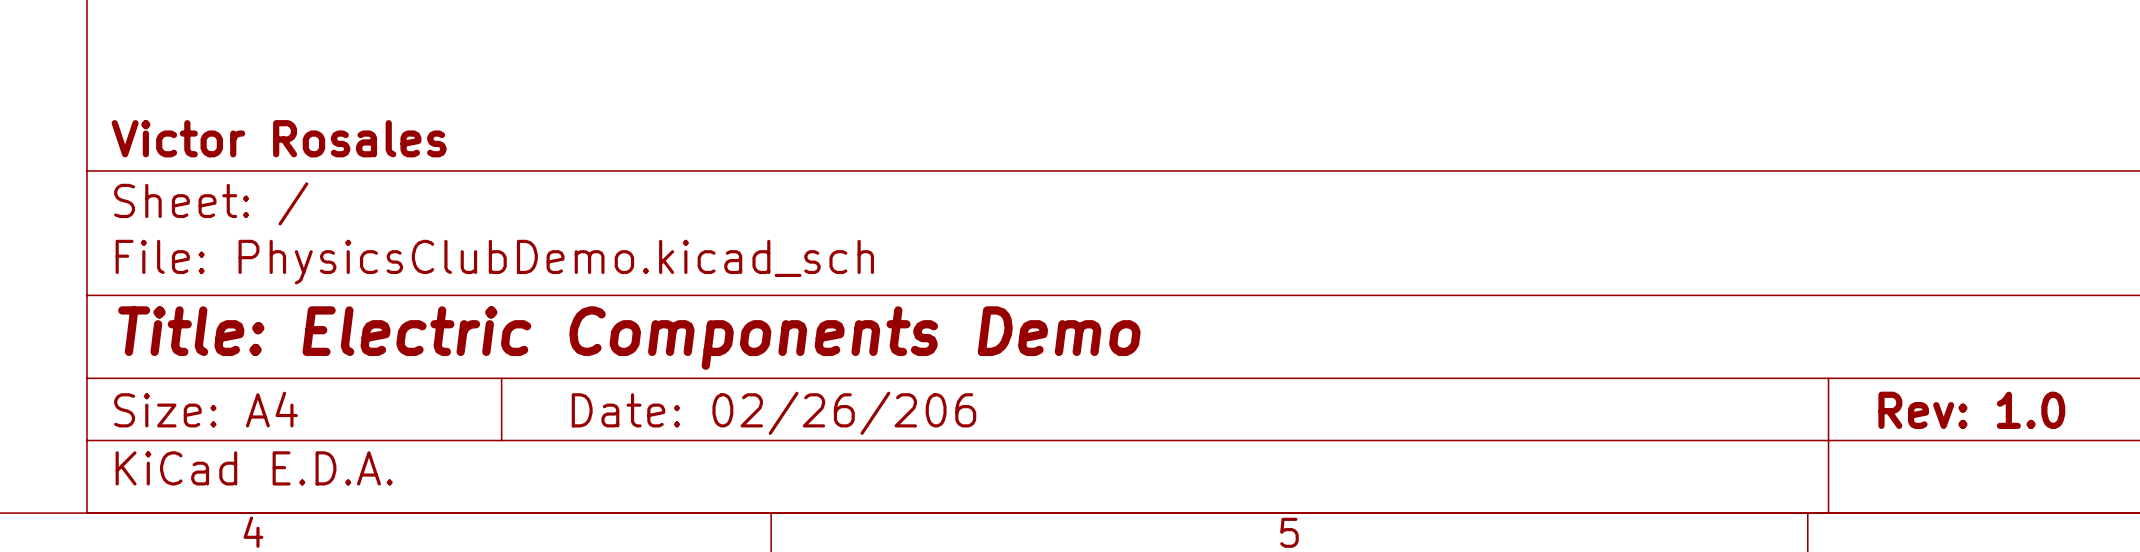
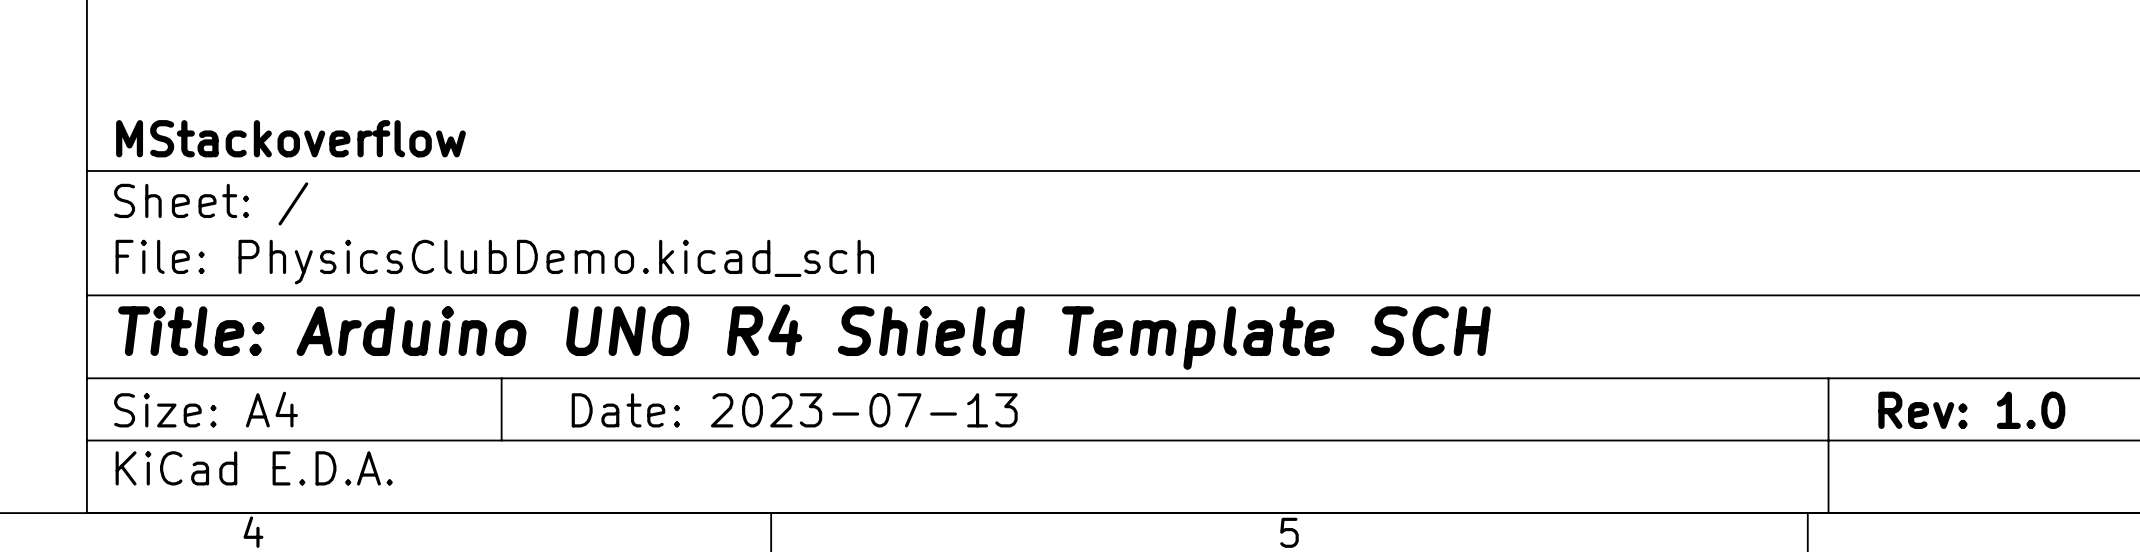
title block: Victor Rosales (279, 138) -> MStackoverflow (290, 138)
title block: Title: Electric Components Demo (629, 338) -> Title: Arduino UNO R4 Shield Template SCH (804, 337)
title block: Date: 02/26/206 (773, 413) -> Date: 2023-07-13 (794, 410)

